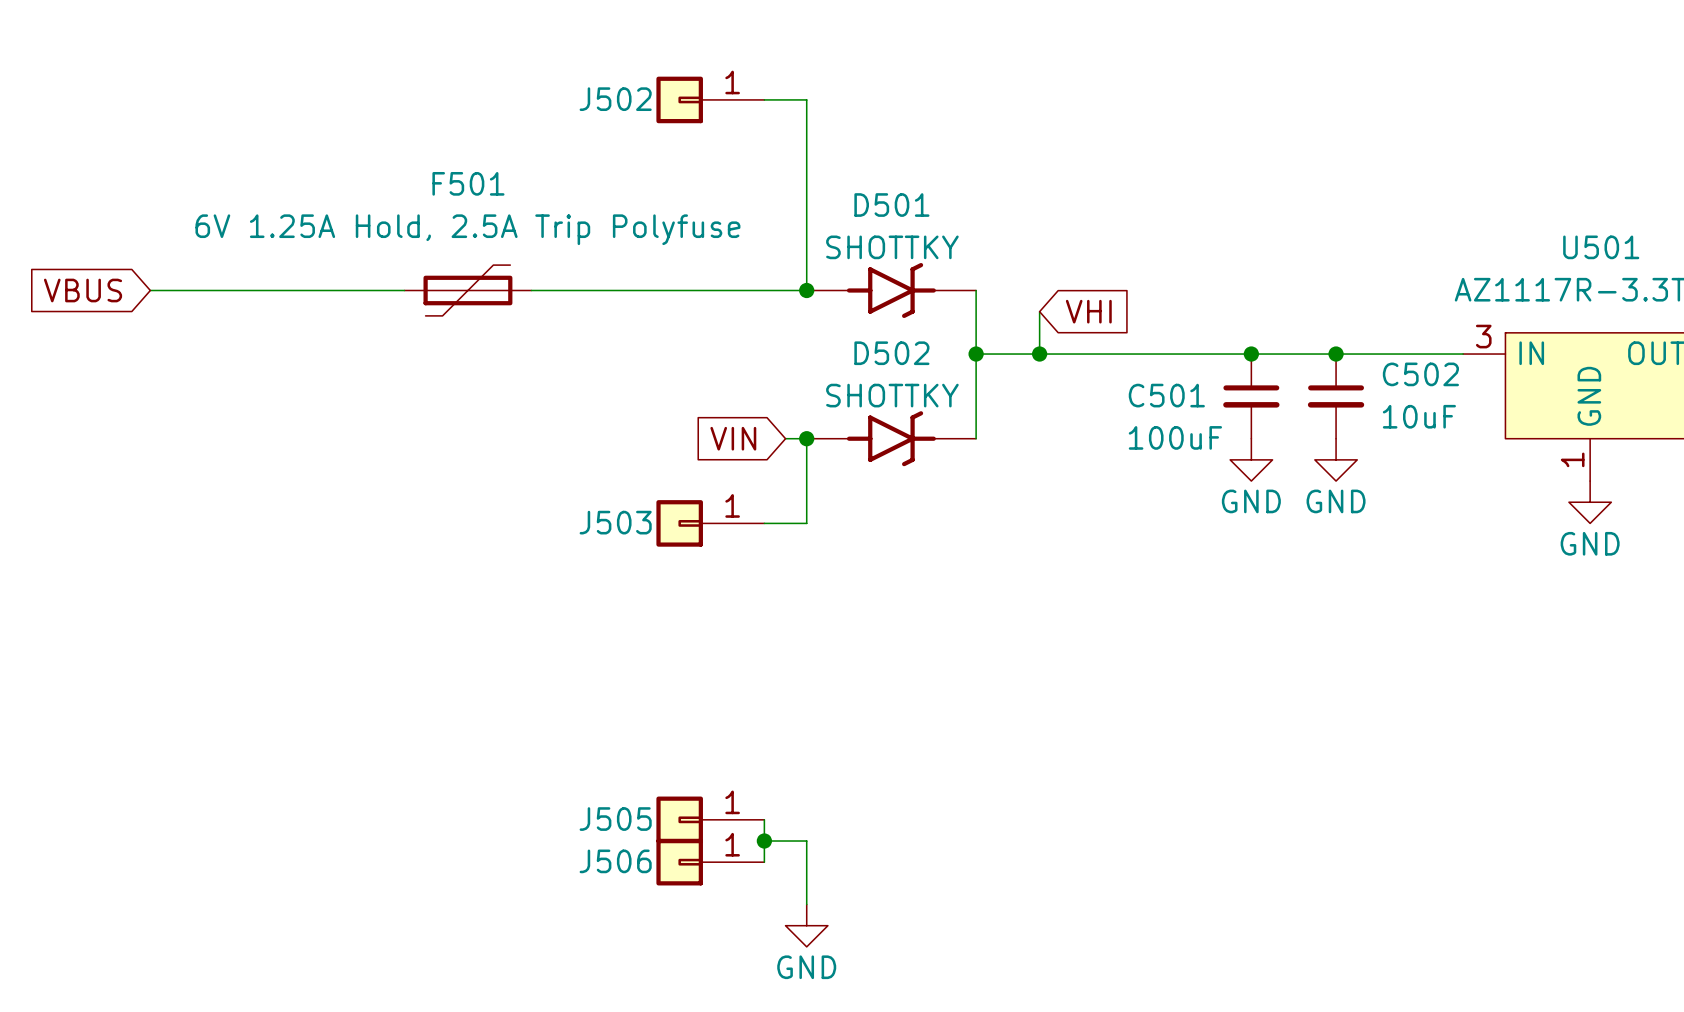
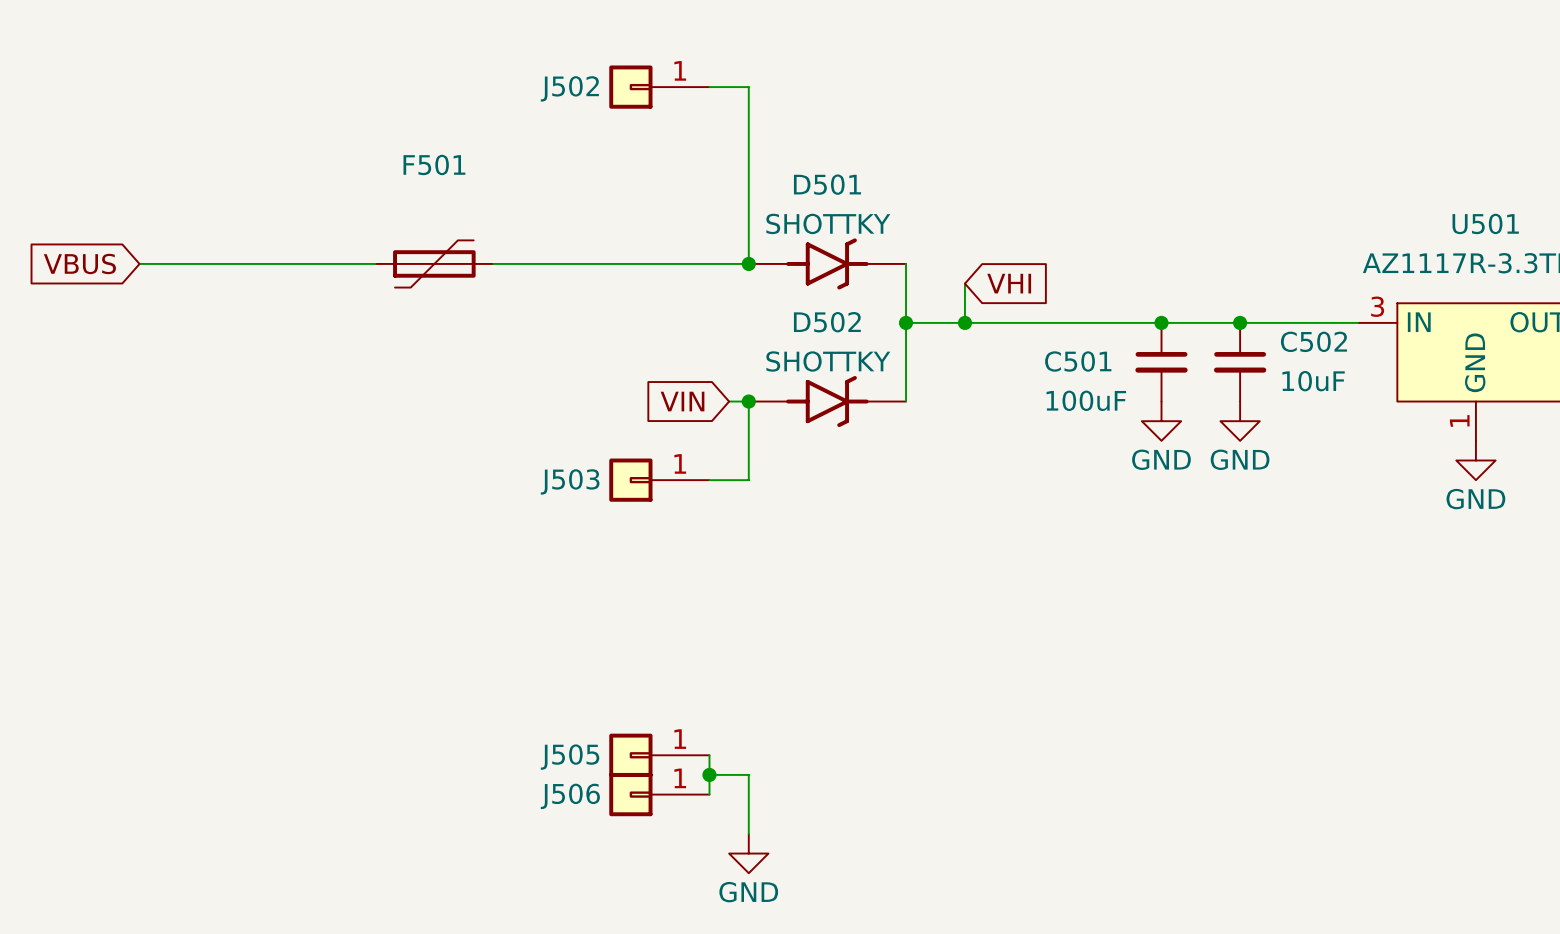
F501 value: 6V 1.25A Hold, 2.5A Trip Polyfuse (467, 229) -> none

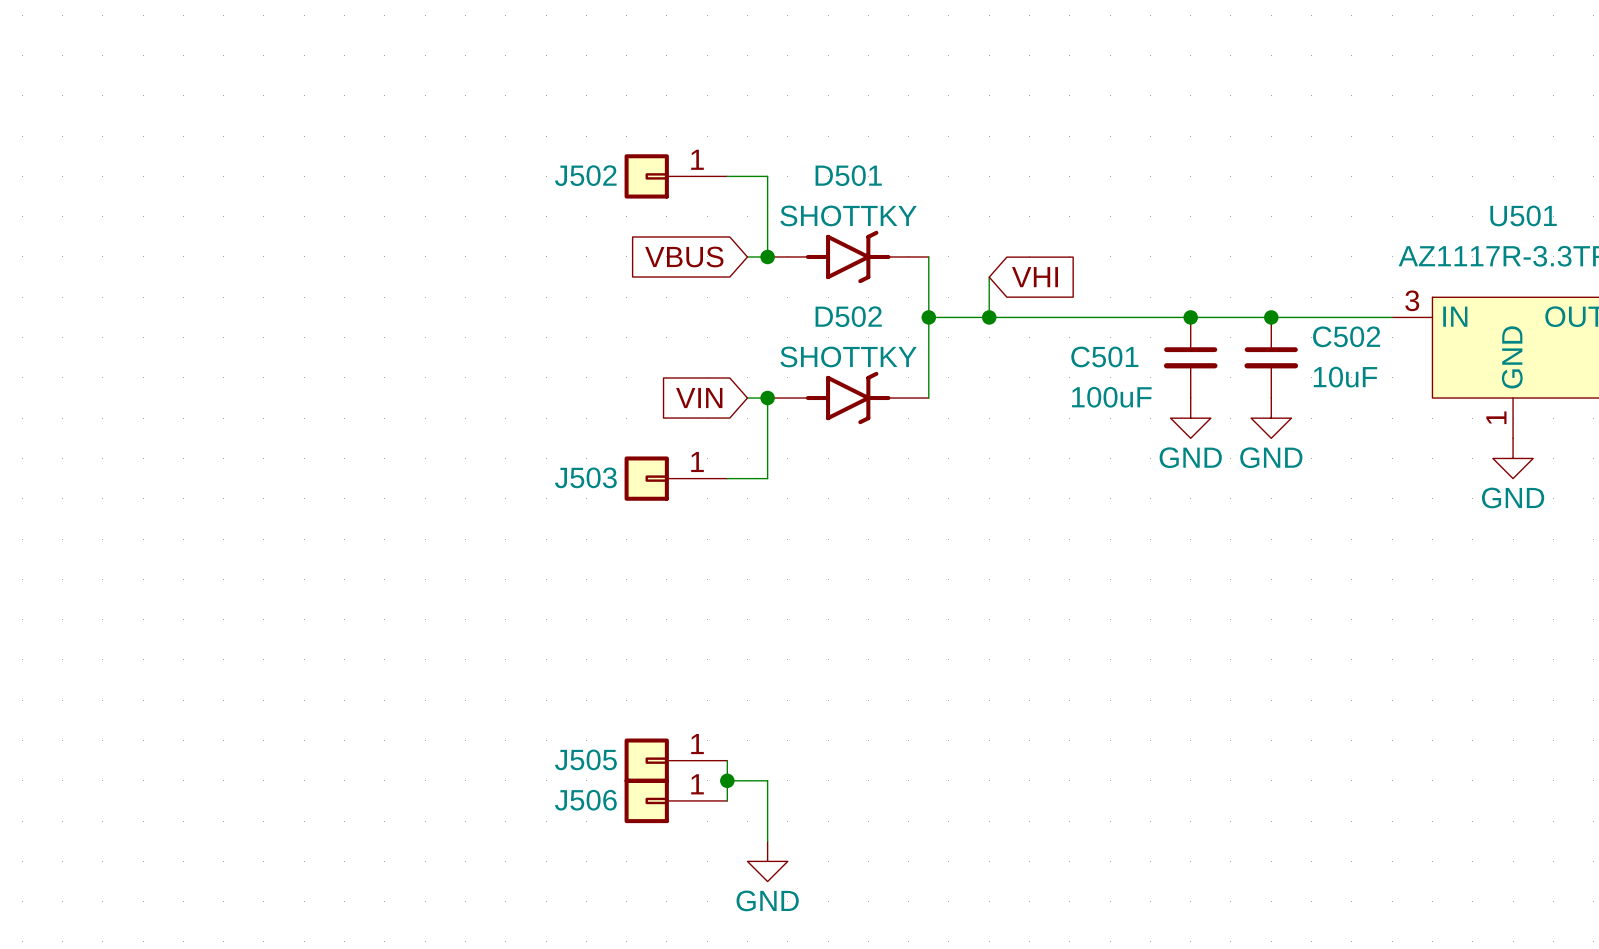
J502 position: (659, 87) -> (675, 176)
wire: (709, 87) (748, 87) (748, 185) -> (727, 176) (767, 176)
global label: VBUS (79, 263) -> none
wire: (139, 263) (375, 263) -> none
F501: (434, 263) -> none
wire: (493, 263) (729, 263) -> none
global label: none -> VBUS (684, 256)

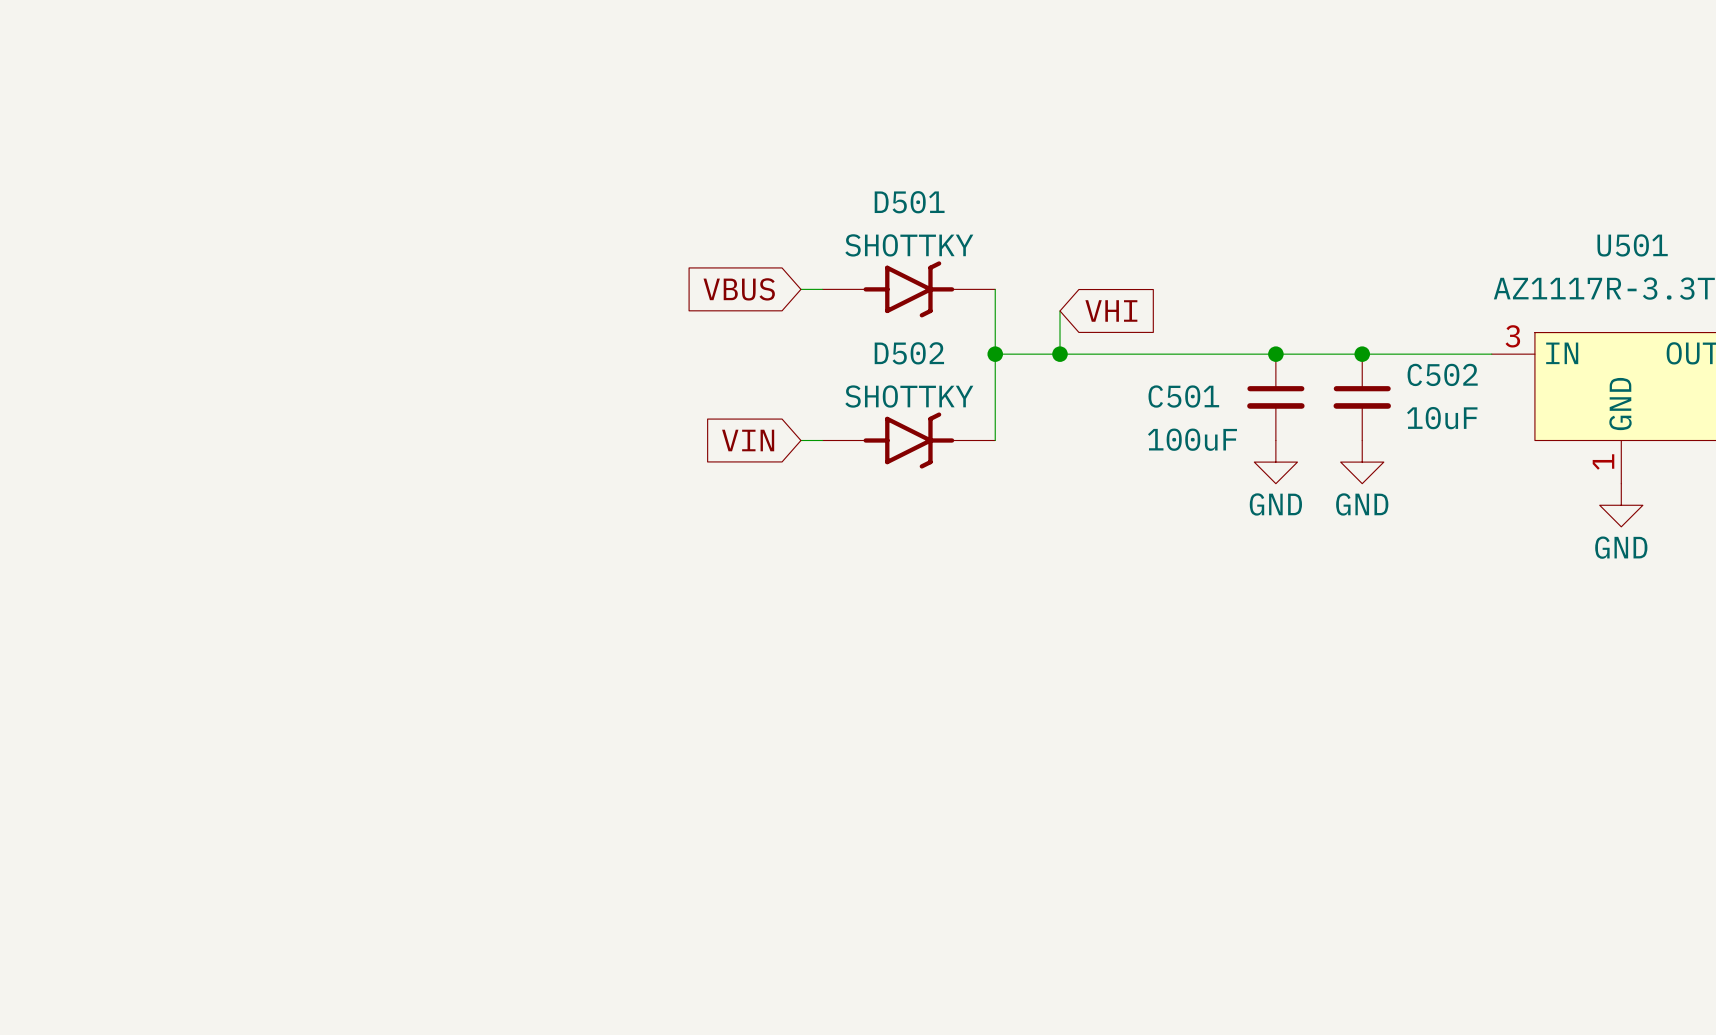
J502: (675, 176) -> none
wire: (727, 176) (767, 176) (767, 256) -> none
junction: (767, 256) -> none
wire: (767, 398) (767, 478) (727, 478) -> none
junction: (767, 398) -> none
J503: (675, 478) -> none
J505: (675, 760) -> none
wire: (727, 760) (727, 800) -> none
wire: (727, 780) (767, 780) (767, 841) -> none
junction: (727, 780) -> none
J506: (675, 800) -> none
power symbol: GND (767, 861) -> none

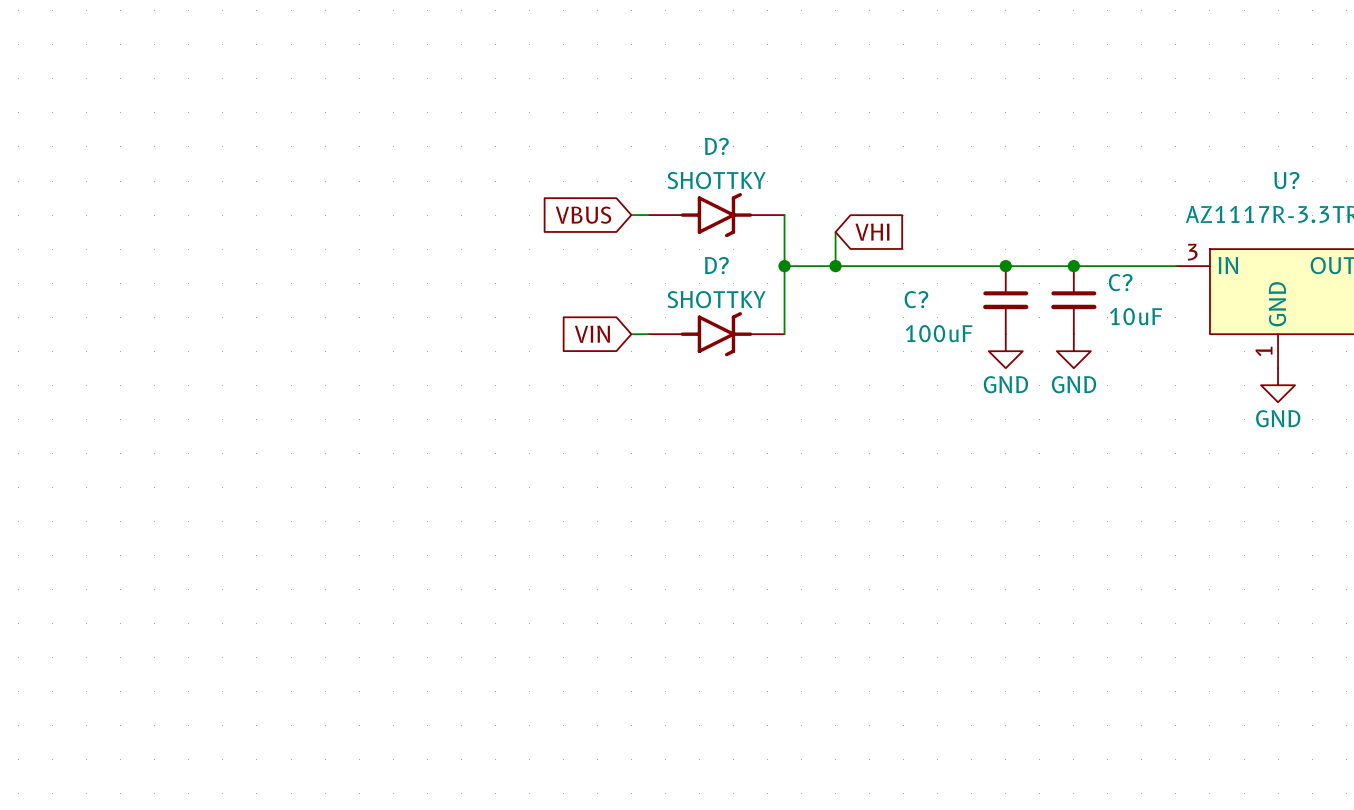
D501 name: D501 (909, 202) -> D? (716, 146)
U501 name: U501 (1632, 245) -> U? (1286, 180)
D502 name: D502 (909, 353) -> D? (716, 265)
C502 name: C502 (1442, 374) -> C? (1120, 282)
C501 name: C501 (1183, 396) -> C? (916, 299)

